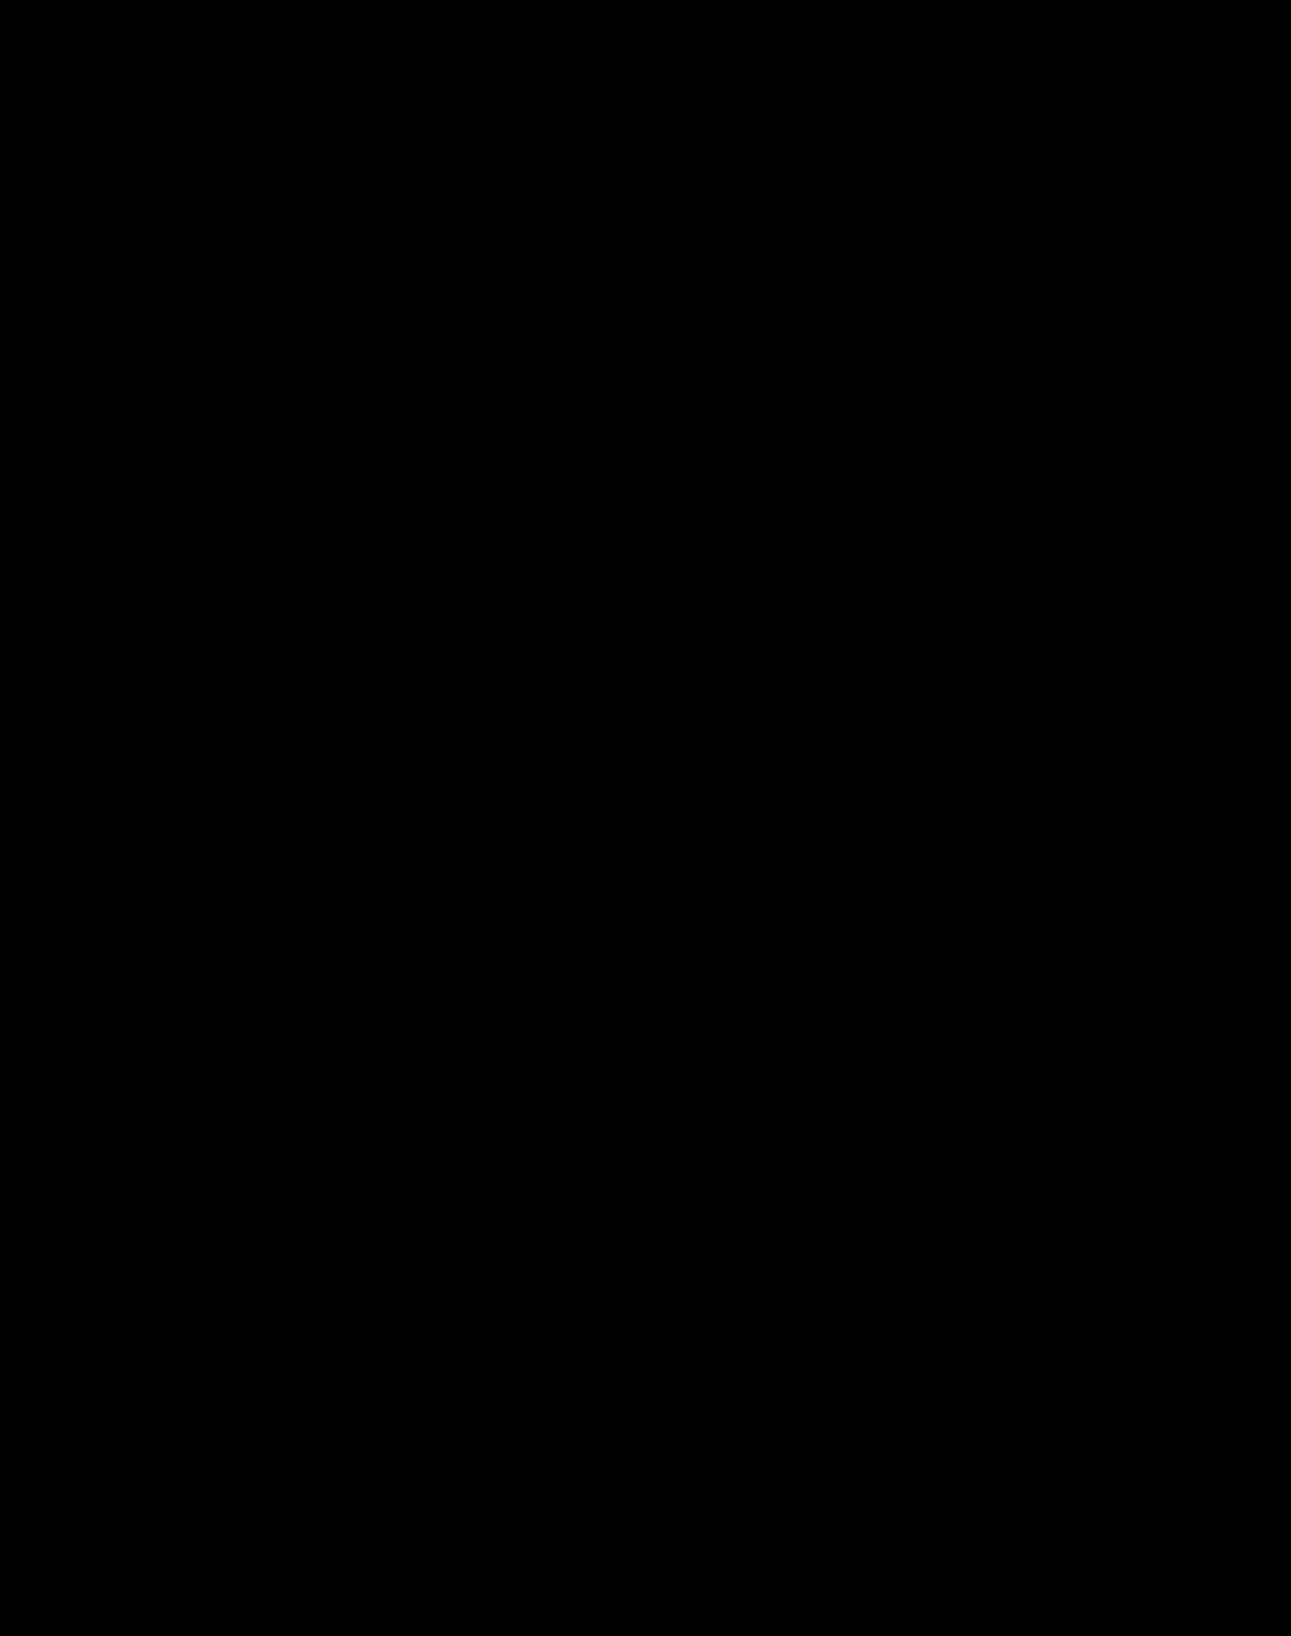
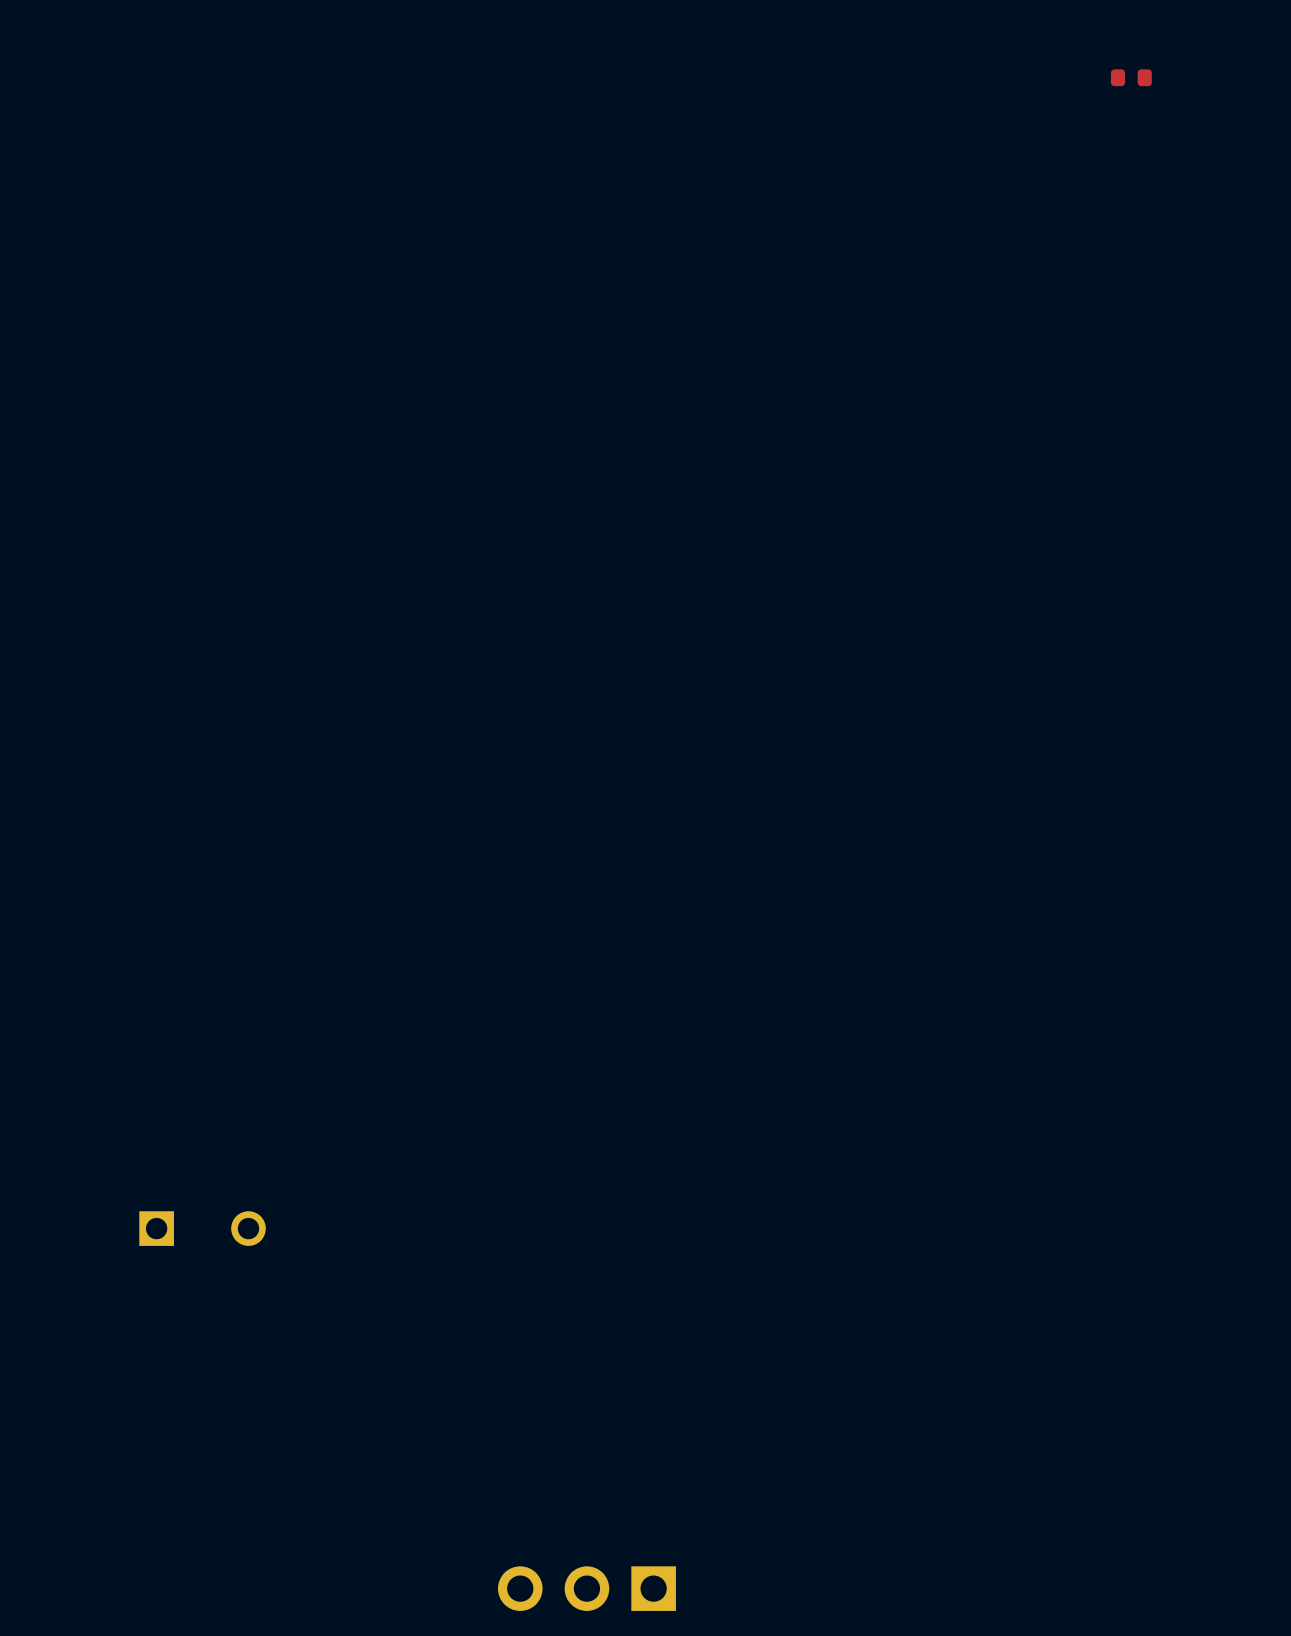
part: none -> (1131, 77)
part: none -> (202, 1228)
part: none -> (586, 1588)

